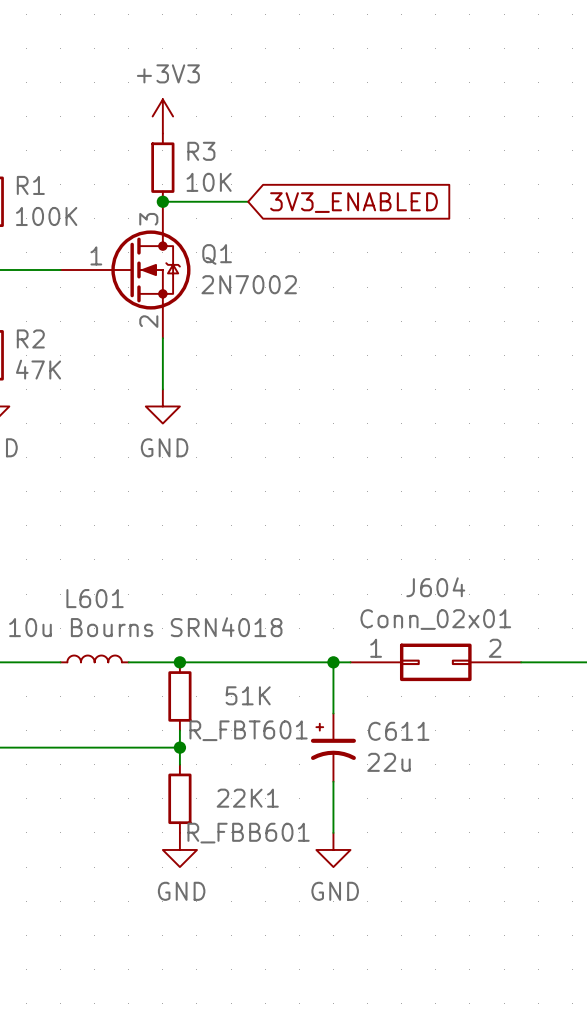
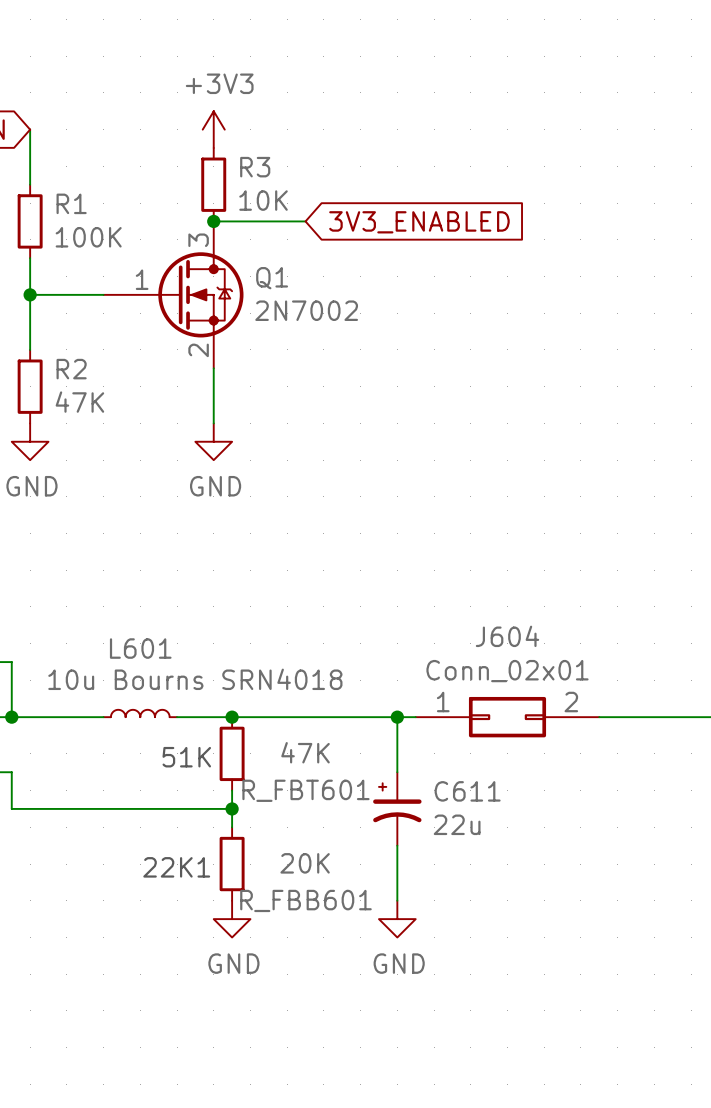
R_FBT601 value: 51K (248, 695) -> 47K (305, 752)
text: none -> 51K (186, 757)
R_FBB601 value: 22K1 (247, 798) -> 20K (305, 863)
text: none -> 22K1 (176, 867)

